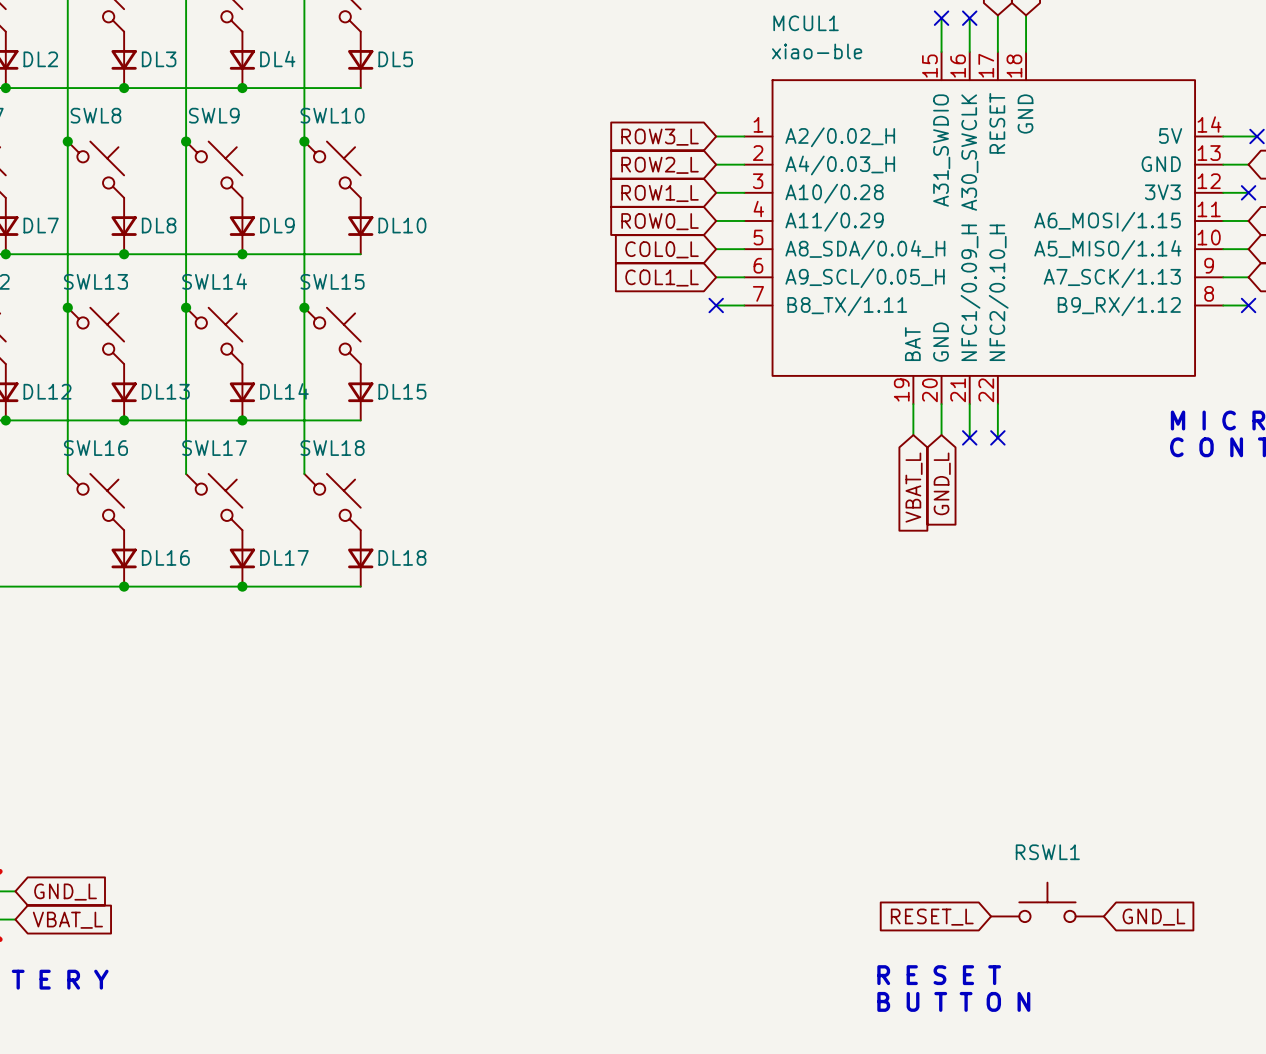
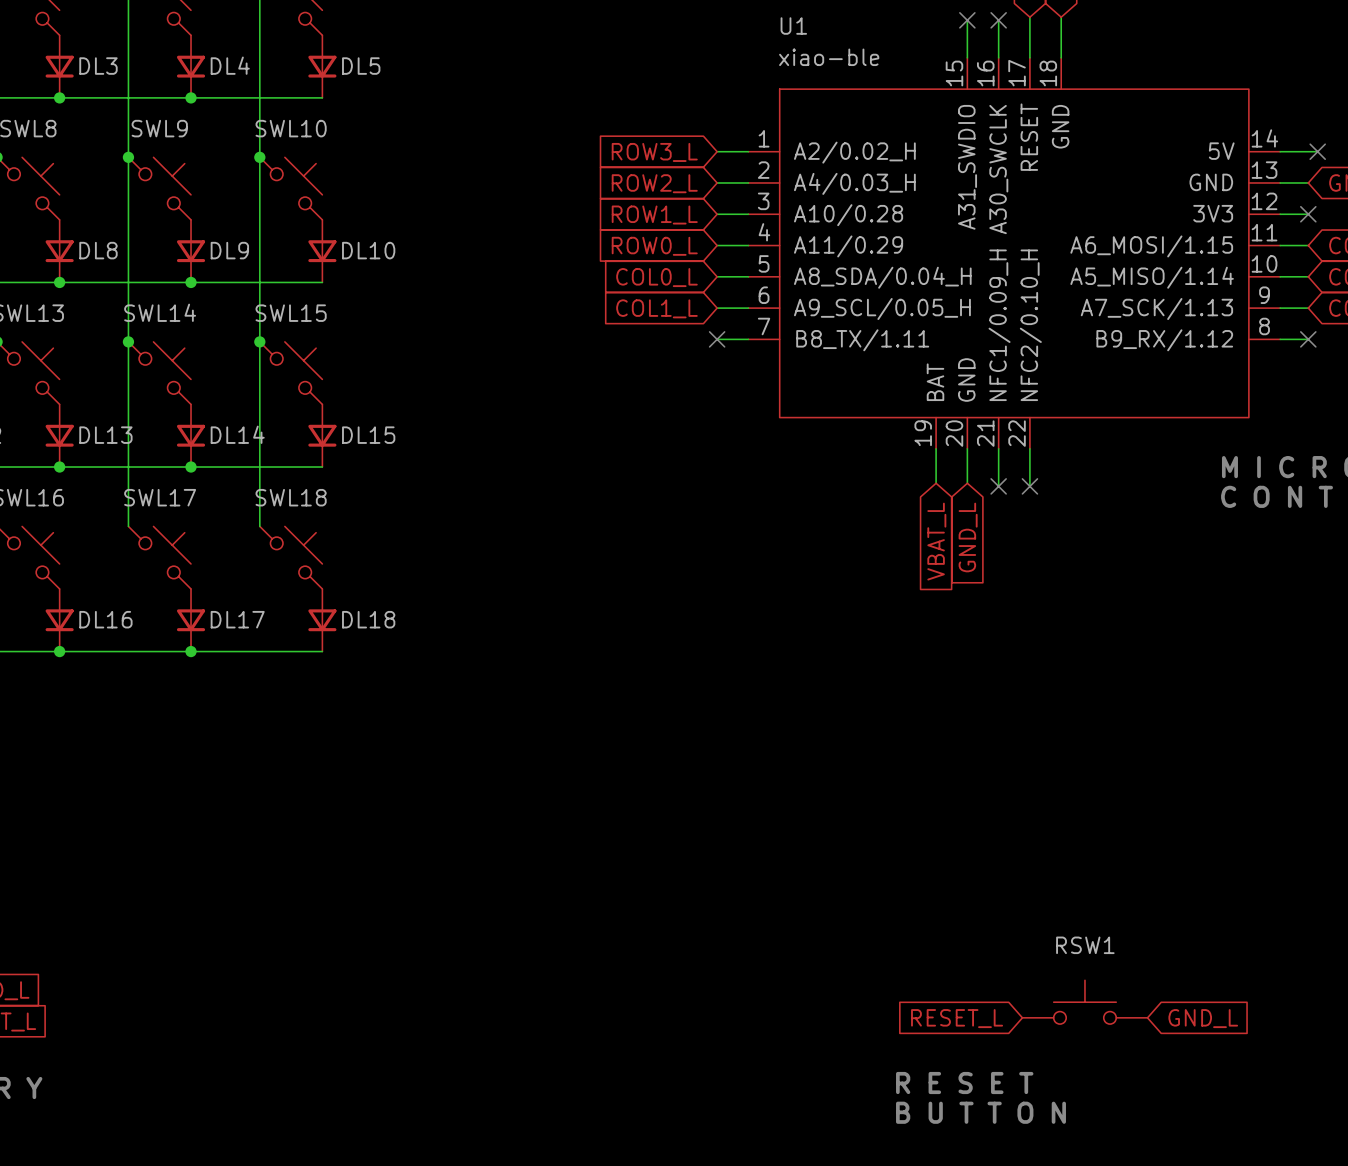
MCUL1 name: MCUL1 (806, 23) -> U1 (793, 26)
RSWL1 name: RSWL1 (1047, 852) -> RSW1 (1085, 945)

